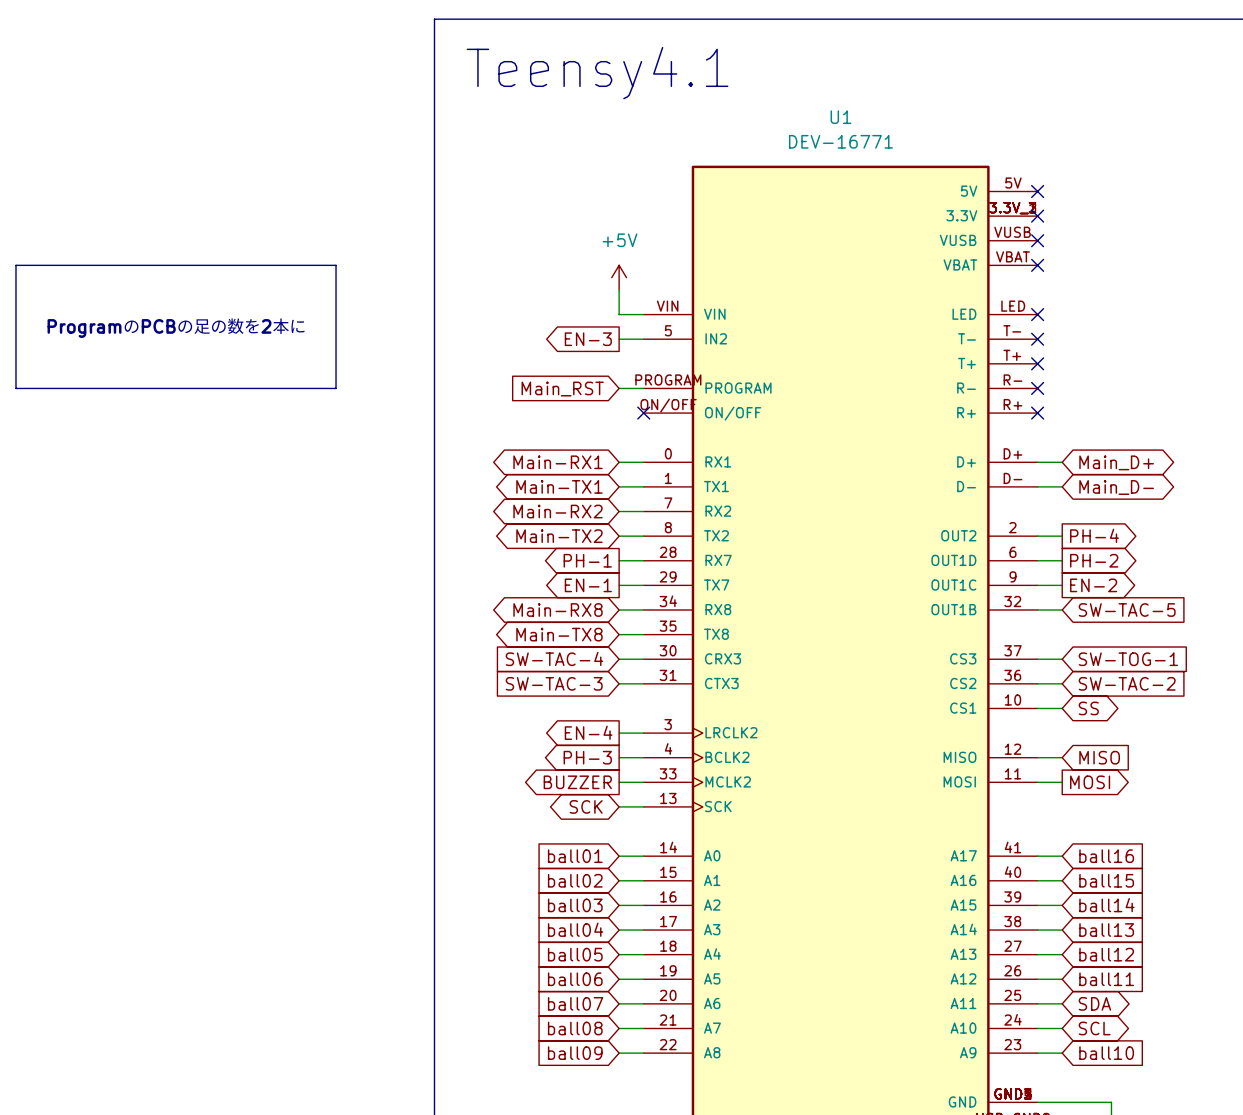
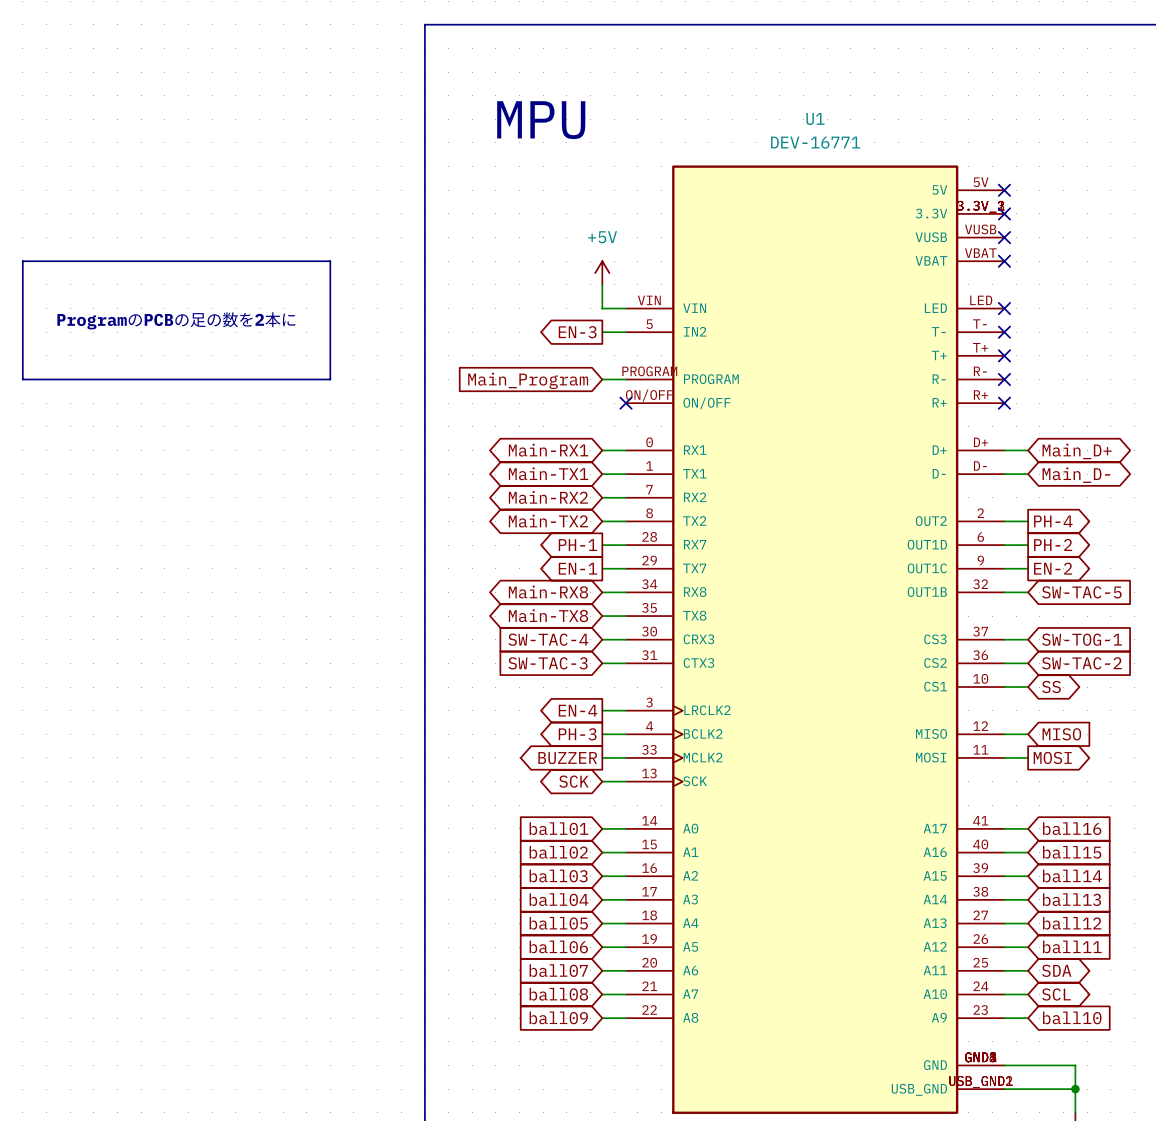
text: Teensy4.1 (597, 73) -> none
text: none -> MPU (541, 120)
global label: Main_RST (562, 389) -> Main_Program (528, 380)

